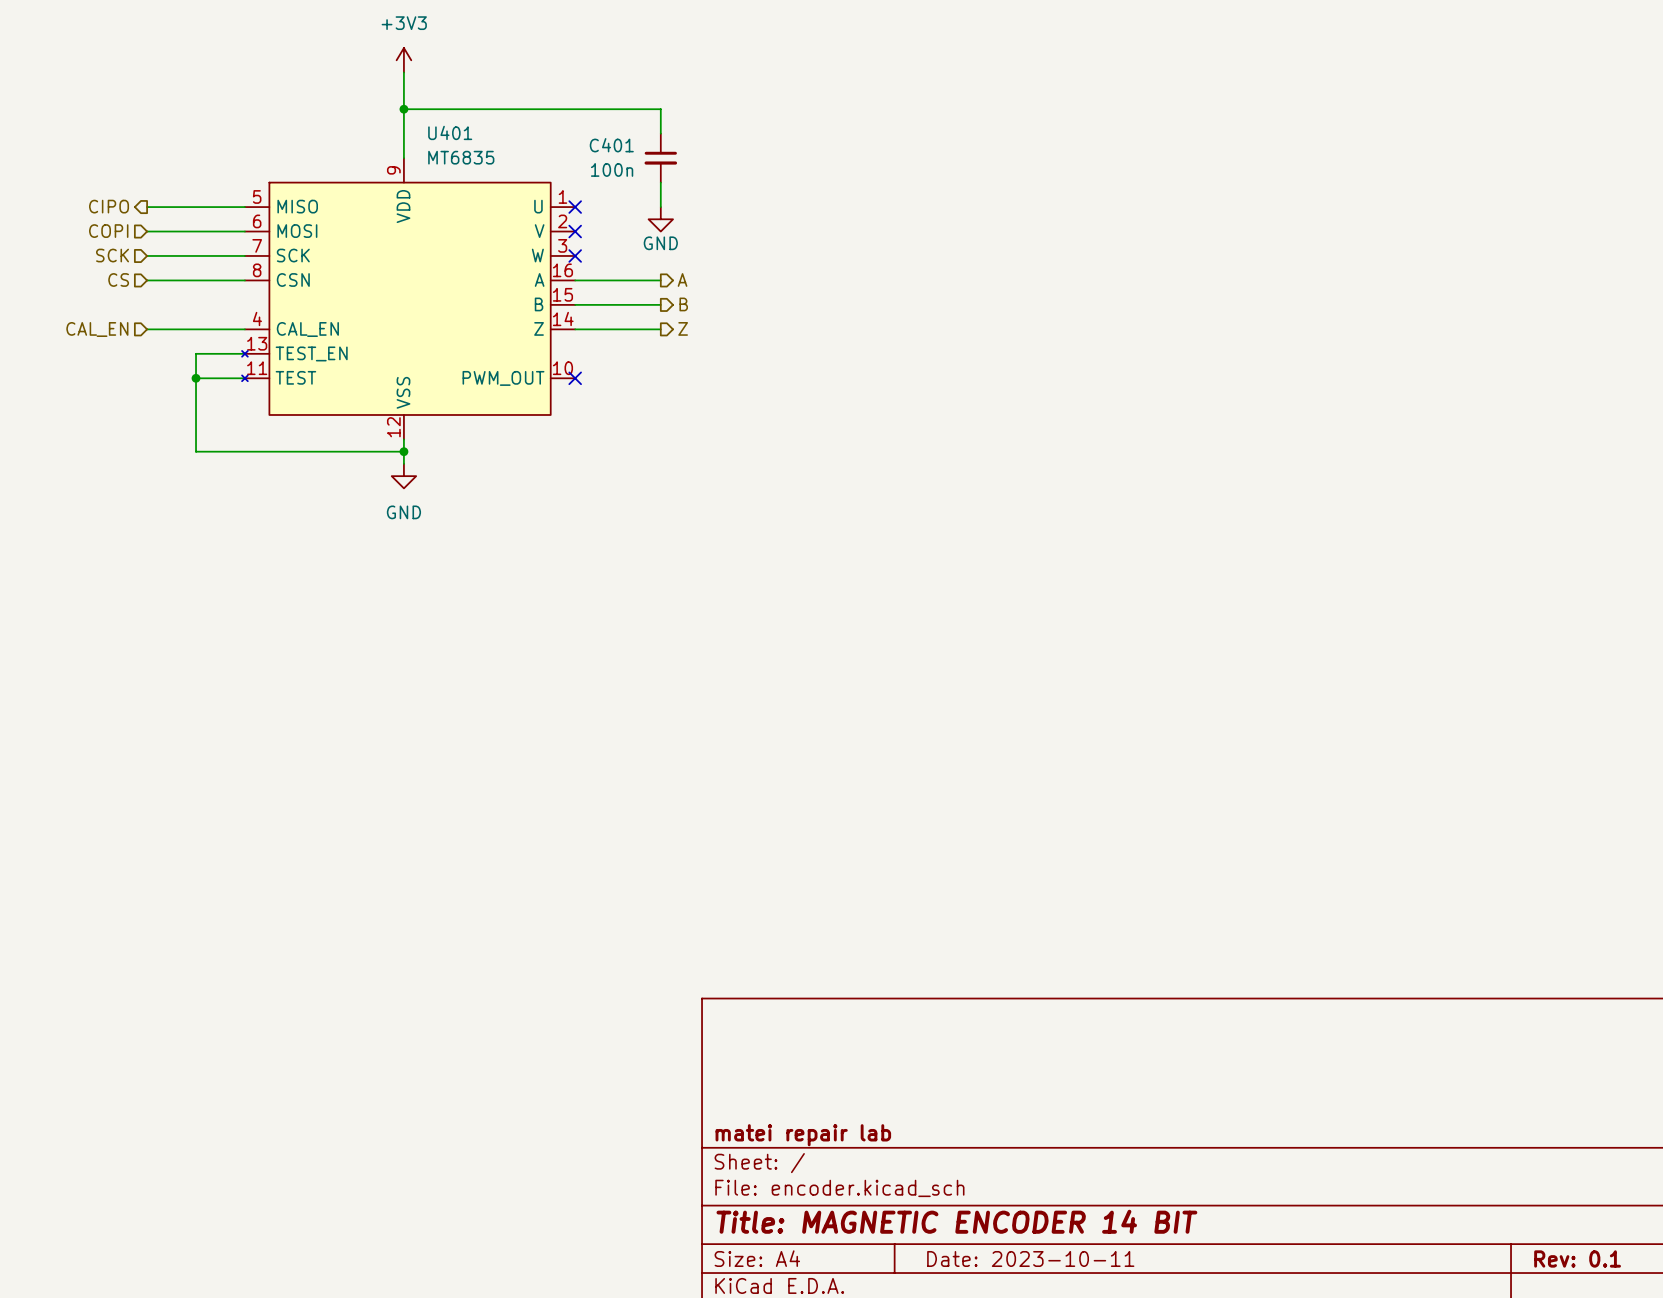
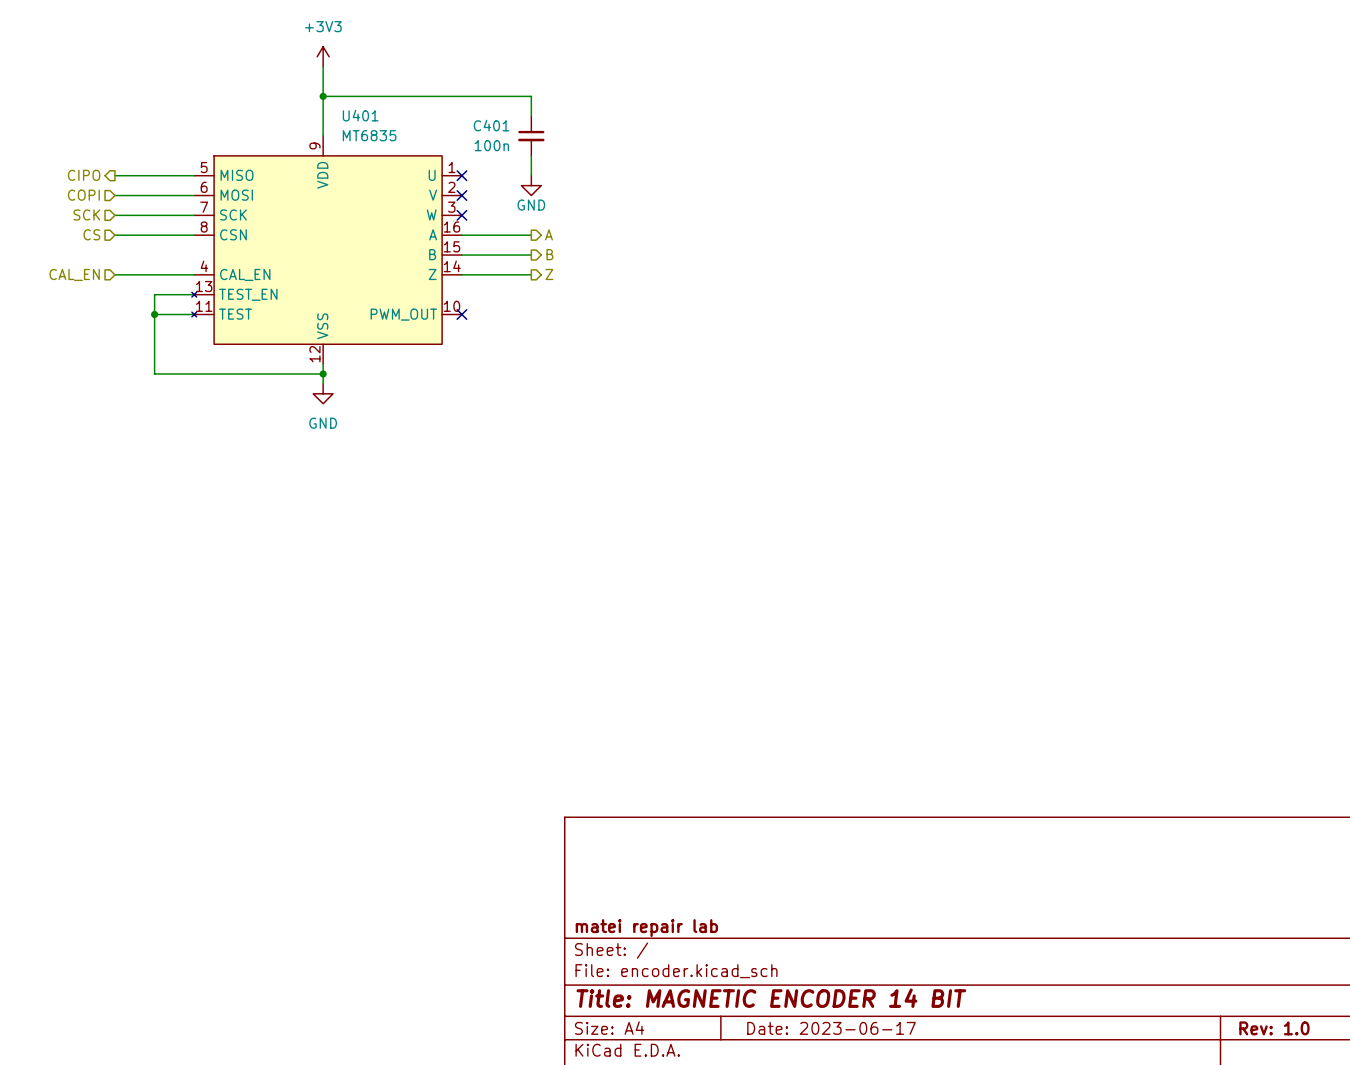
title block: Date: 2023-10-11 (1030, 1258) -> Date: 2023-06-17 (831, 1028)
title block: Rev: 0.1 (1577, 1258) -> Rev: 1.0 (1274, 1028)

